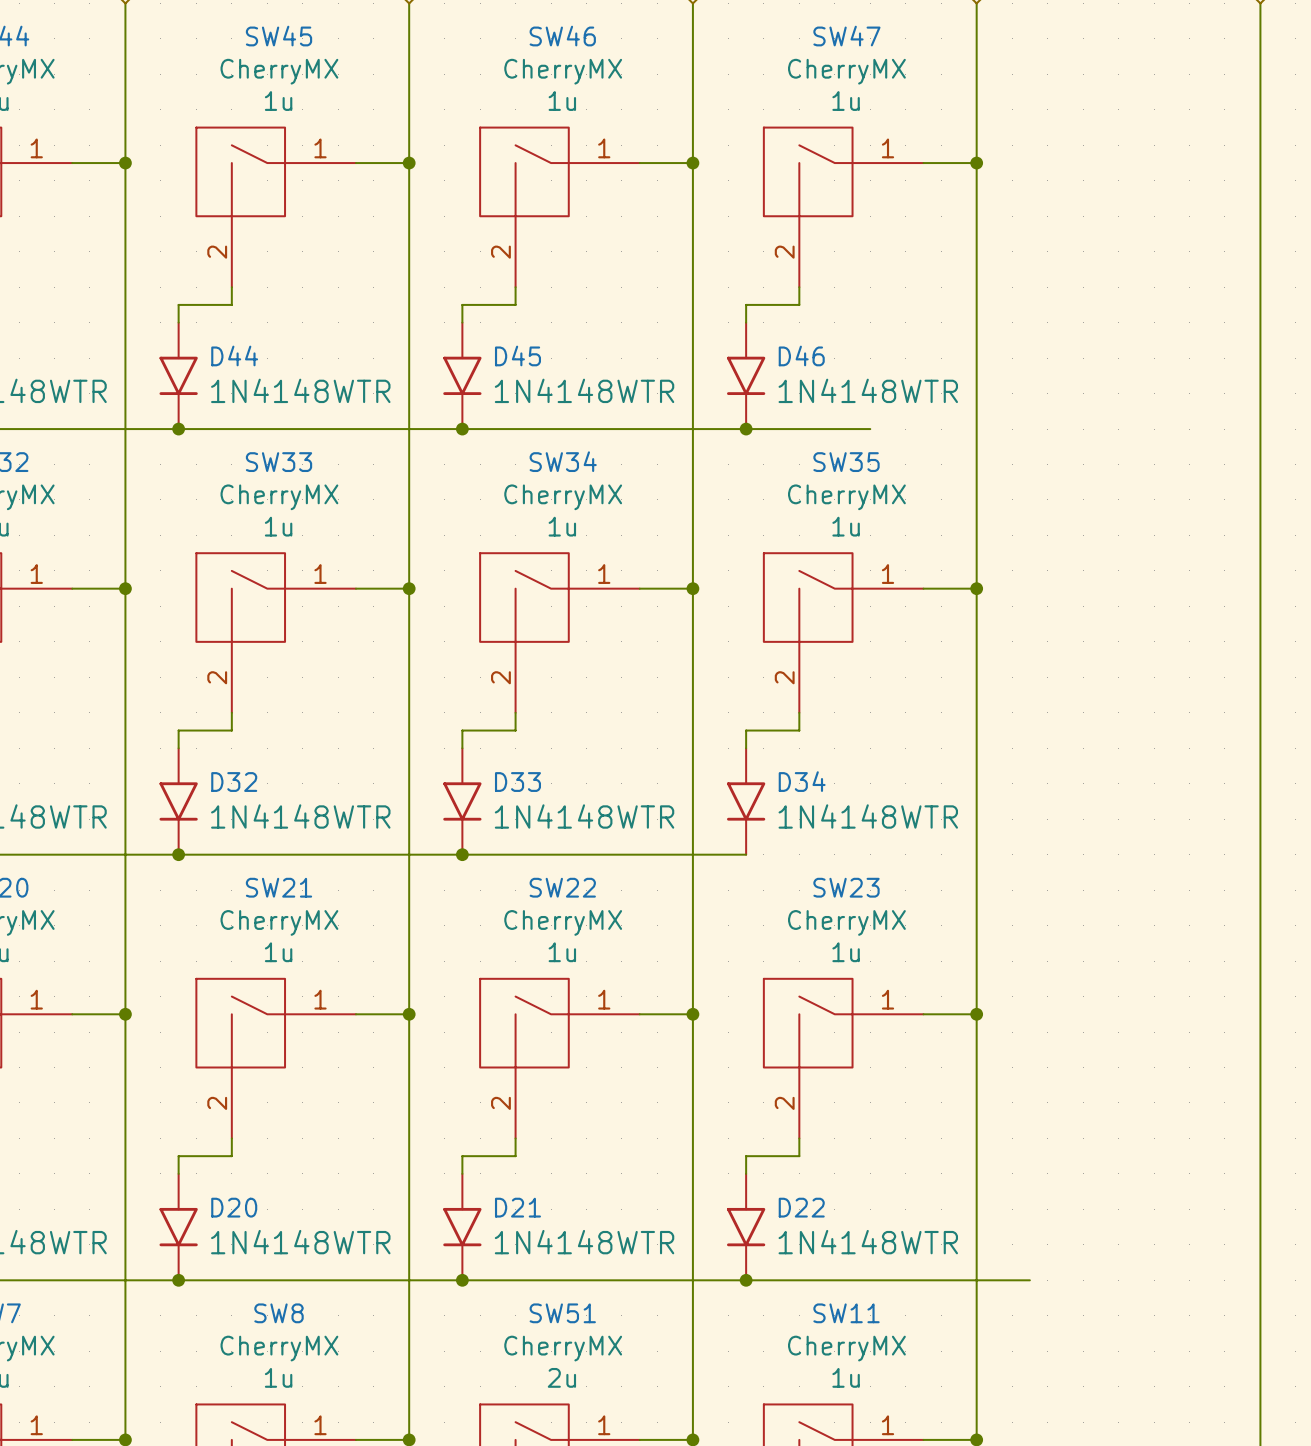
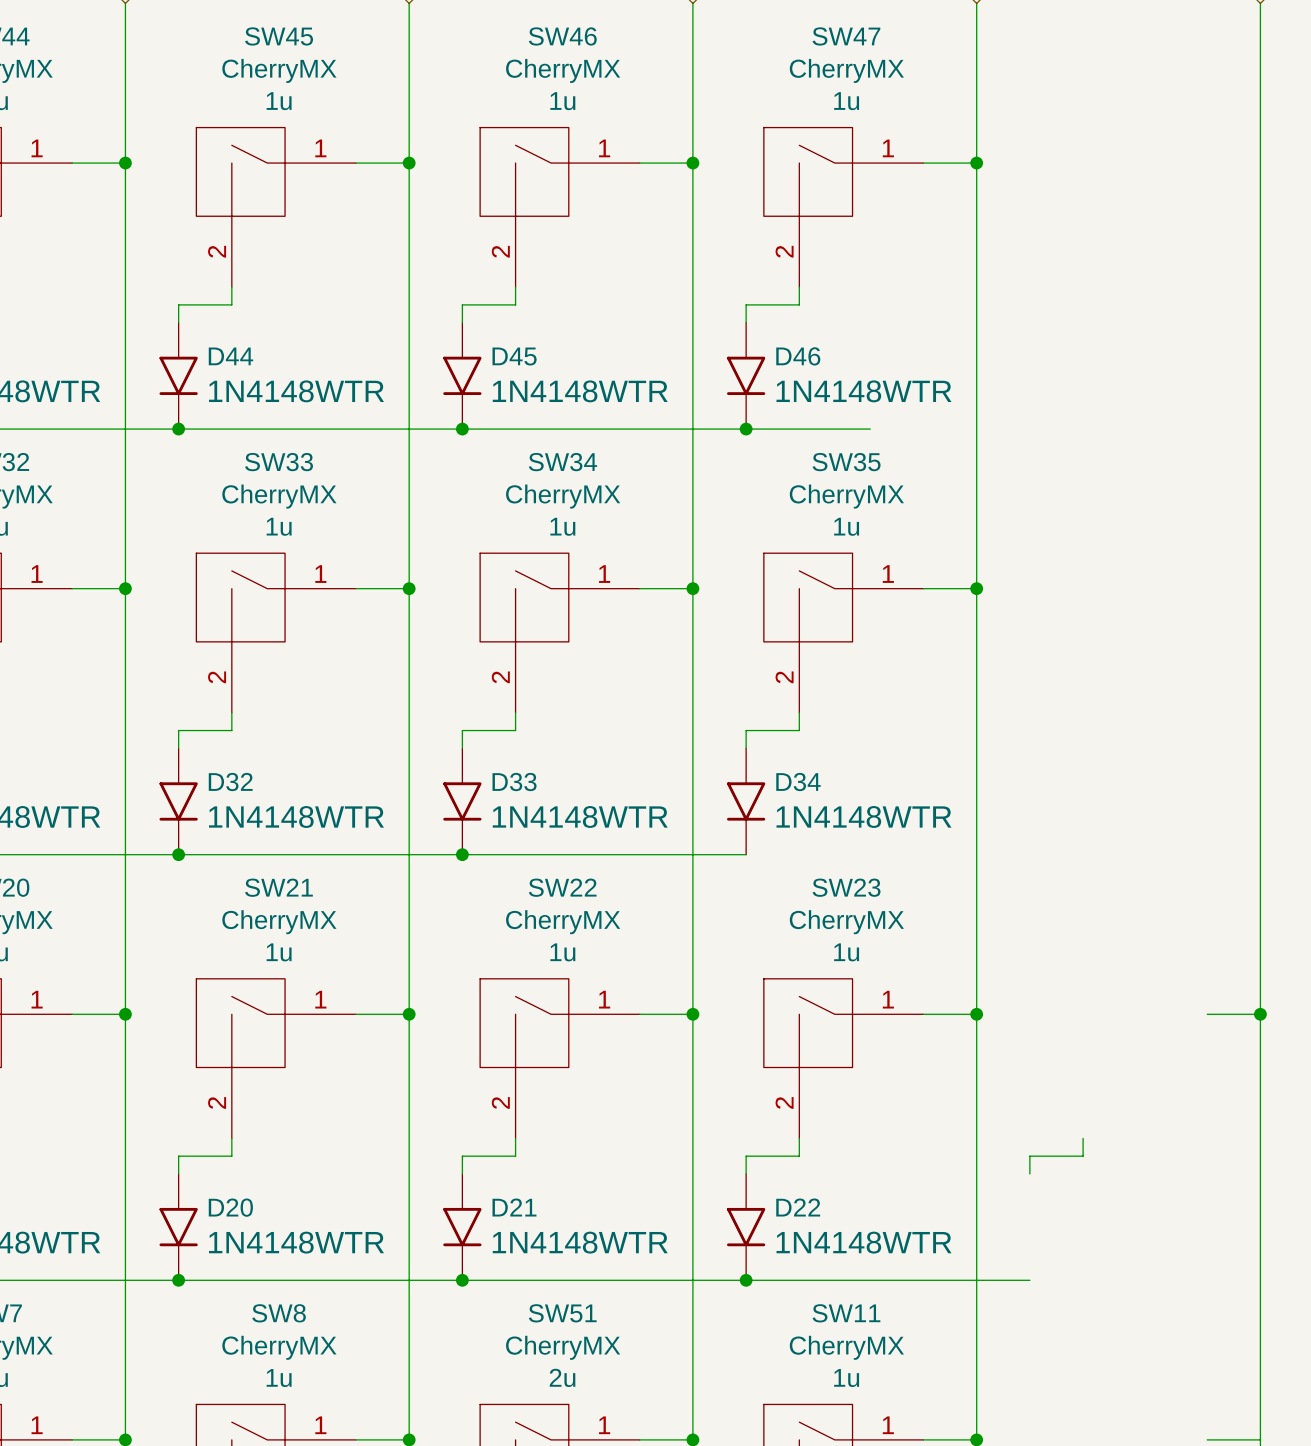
wire: none -> (1207, 1014) (1260, 1014)
junction: none -> (1260, 1014)
wire: none -> (1083, 1138) (1083, 1156) (1029, 1156) (1029, 1173)
wire: none -> (1207, 1439) (1260, 1439)

